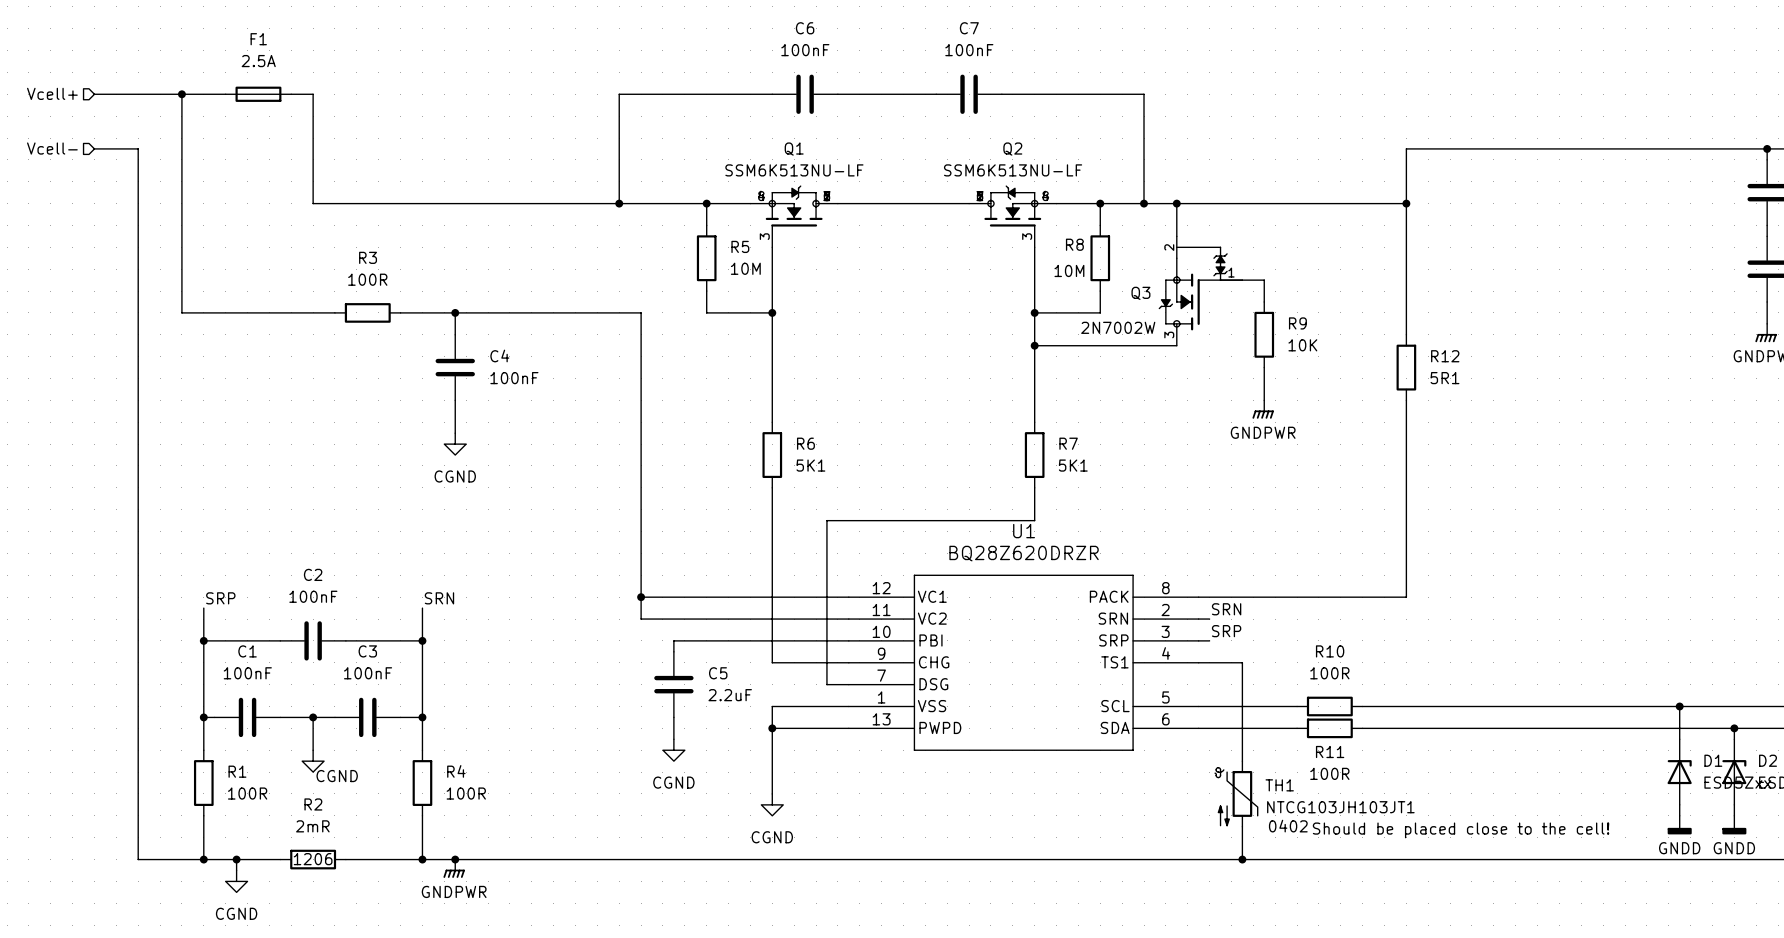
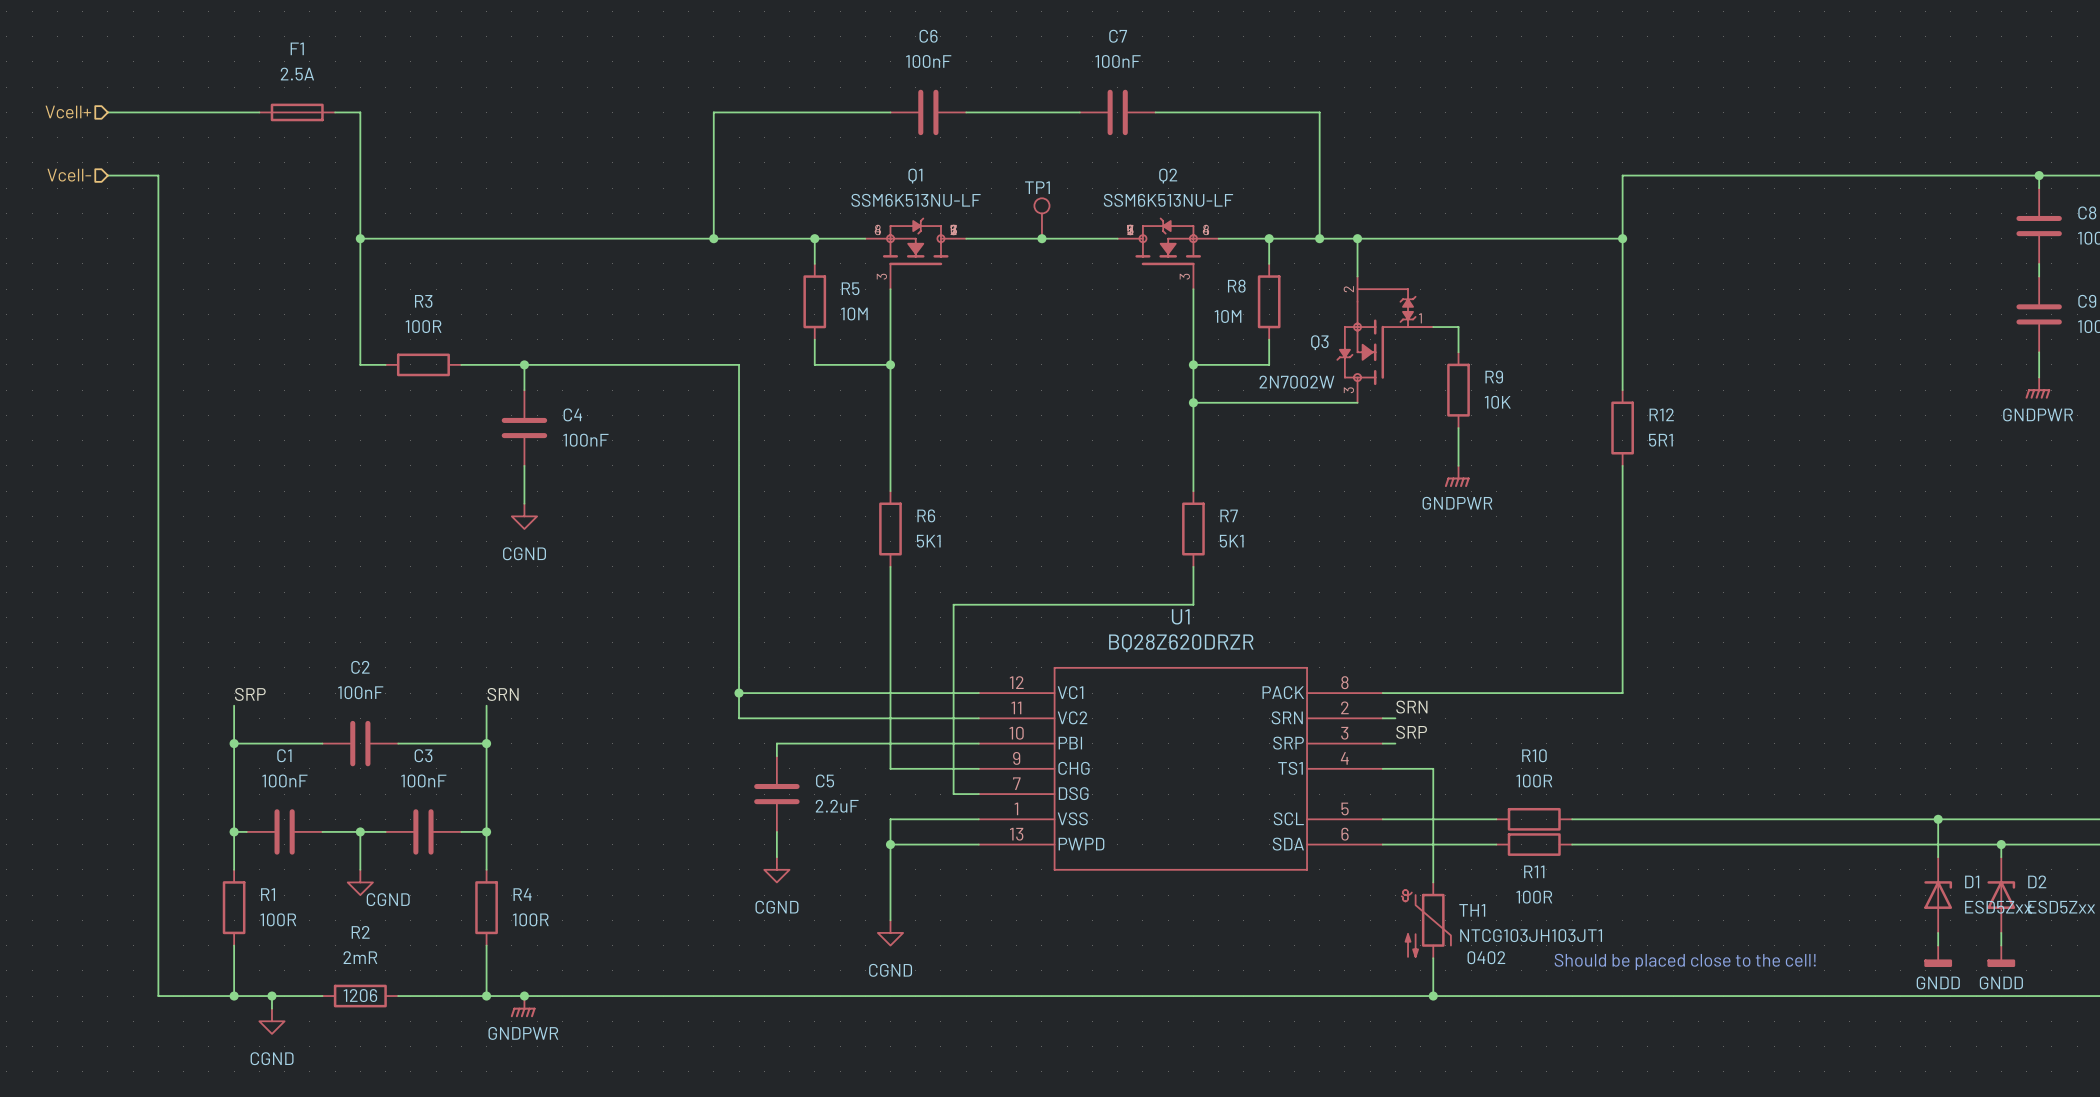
wire: (181, 94) (181, 312) (313, 312) -> (360, 238) (360, 364)
junction: (181, 94) -> none
TP1: none -> (1041, 218)
junction: none -> (360, 238)
junction: none -> (1041, 238)

